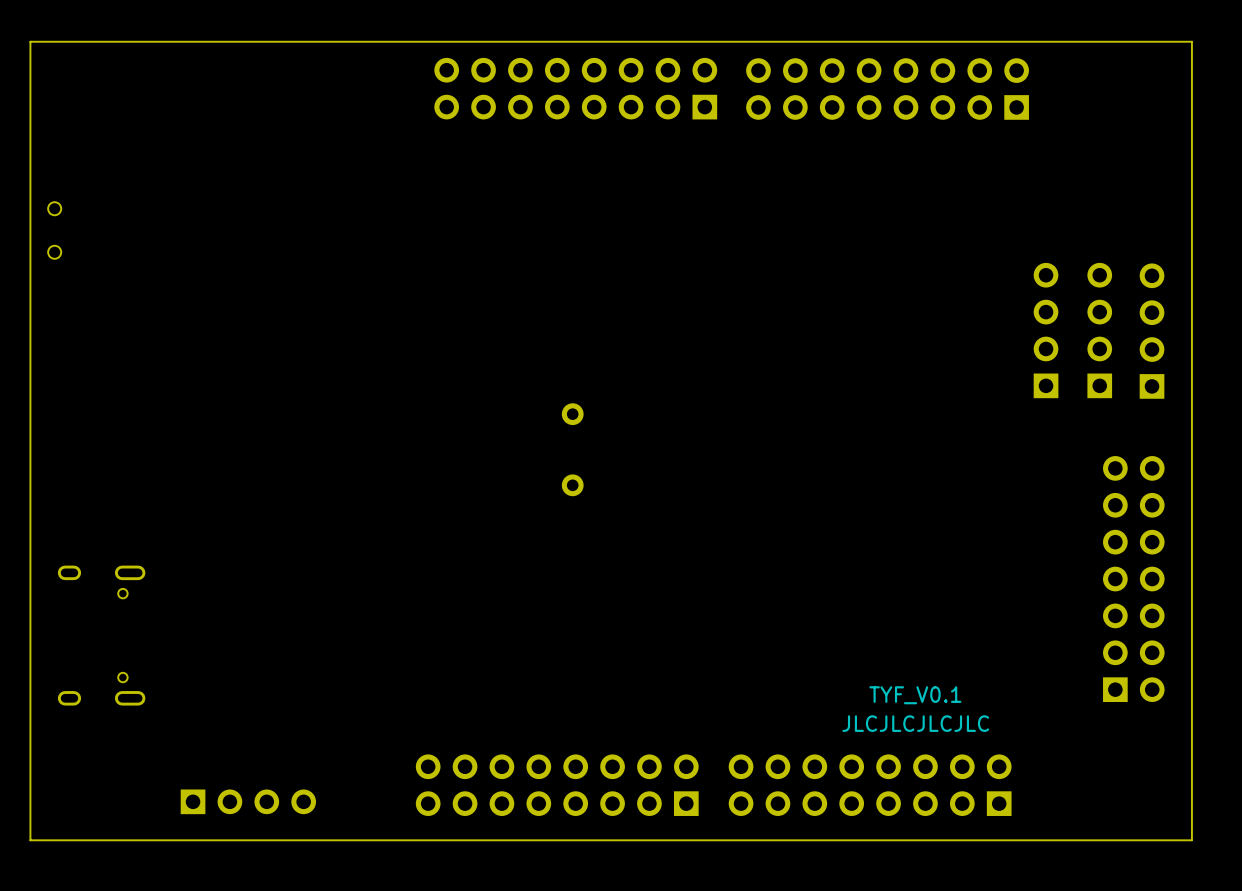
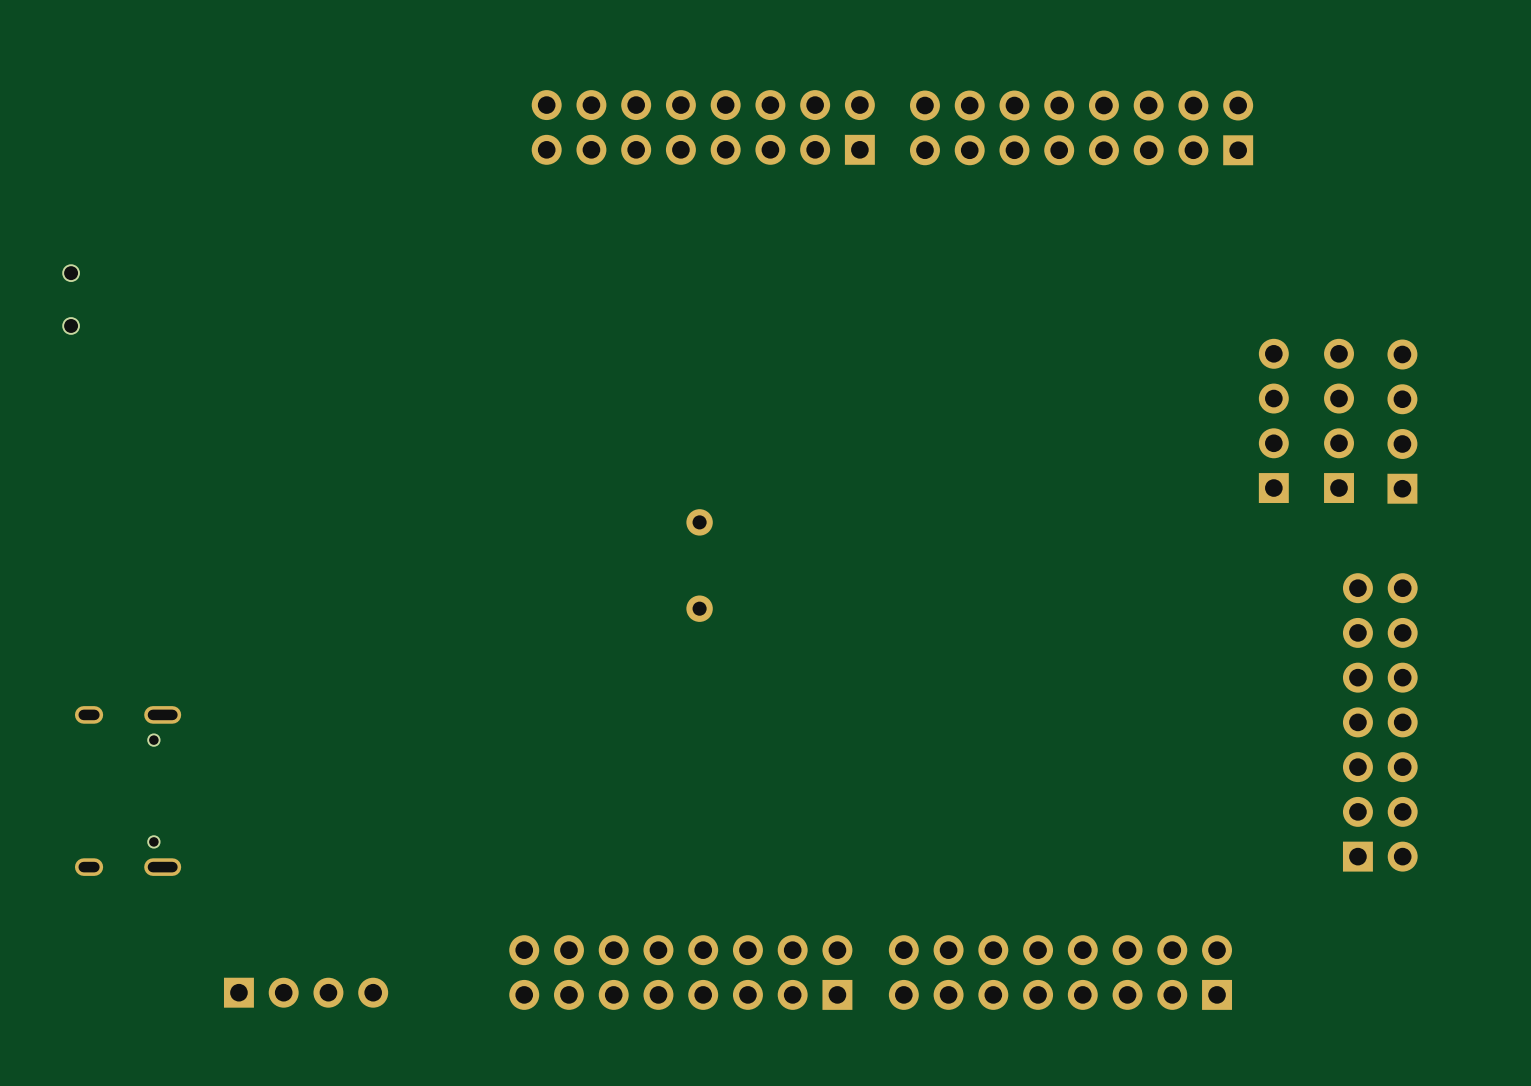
board edge: (1191, 41) (1191, 840) (30, 840) (30, 41) (1191, 41) -> none
text: TYF_V0.1 (915, 695) -> none
text: JLCJLCJLCJLC (915, 723) -> none

